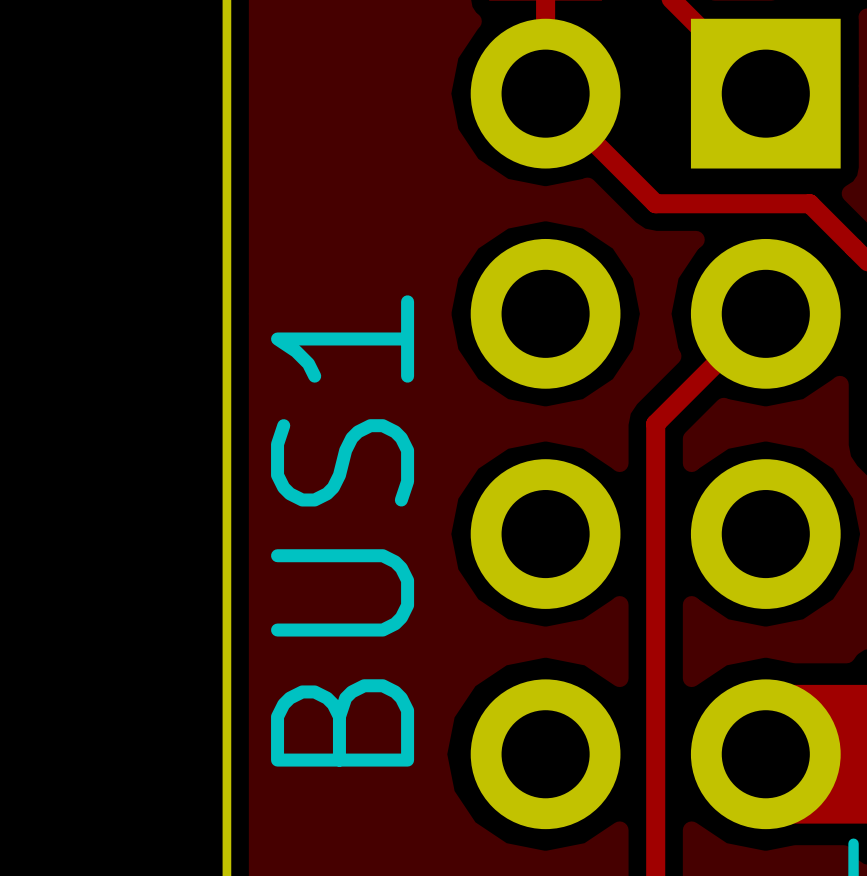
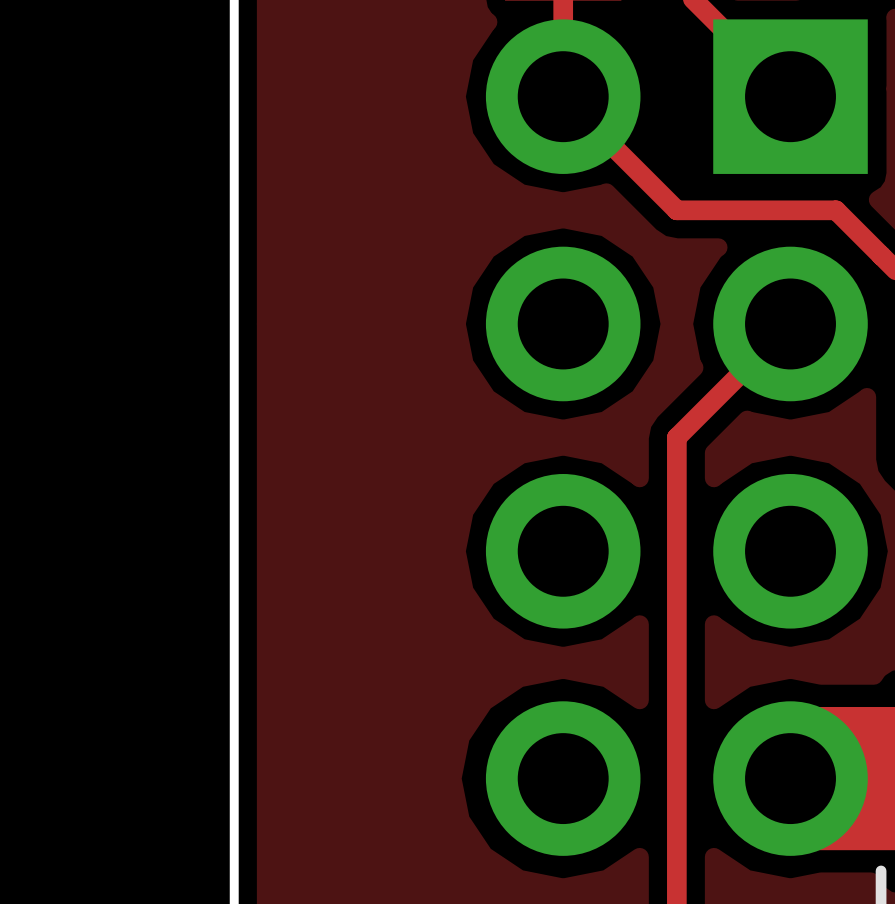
part value: BUS1 (342, 530) -> none

